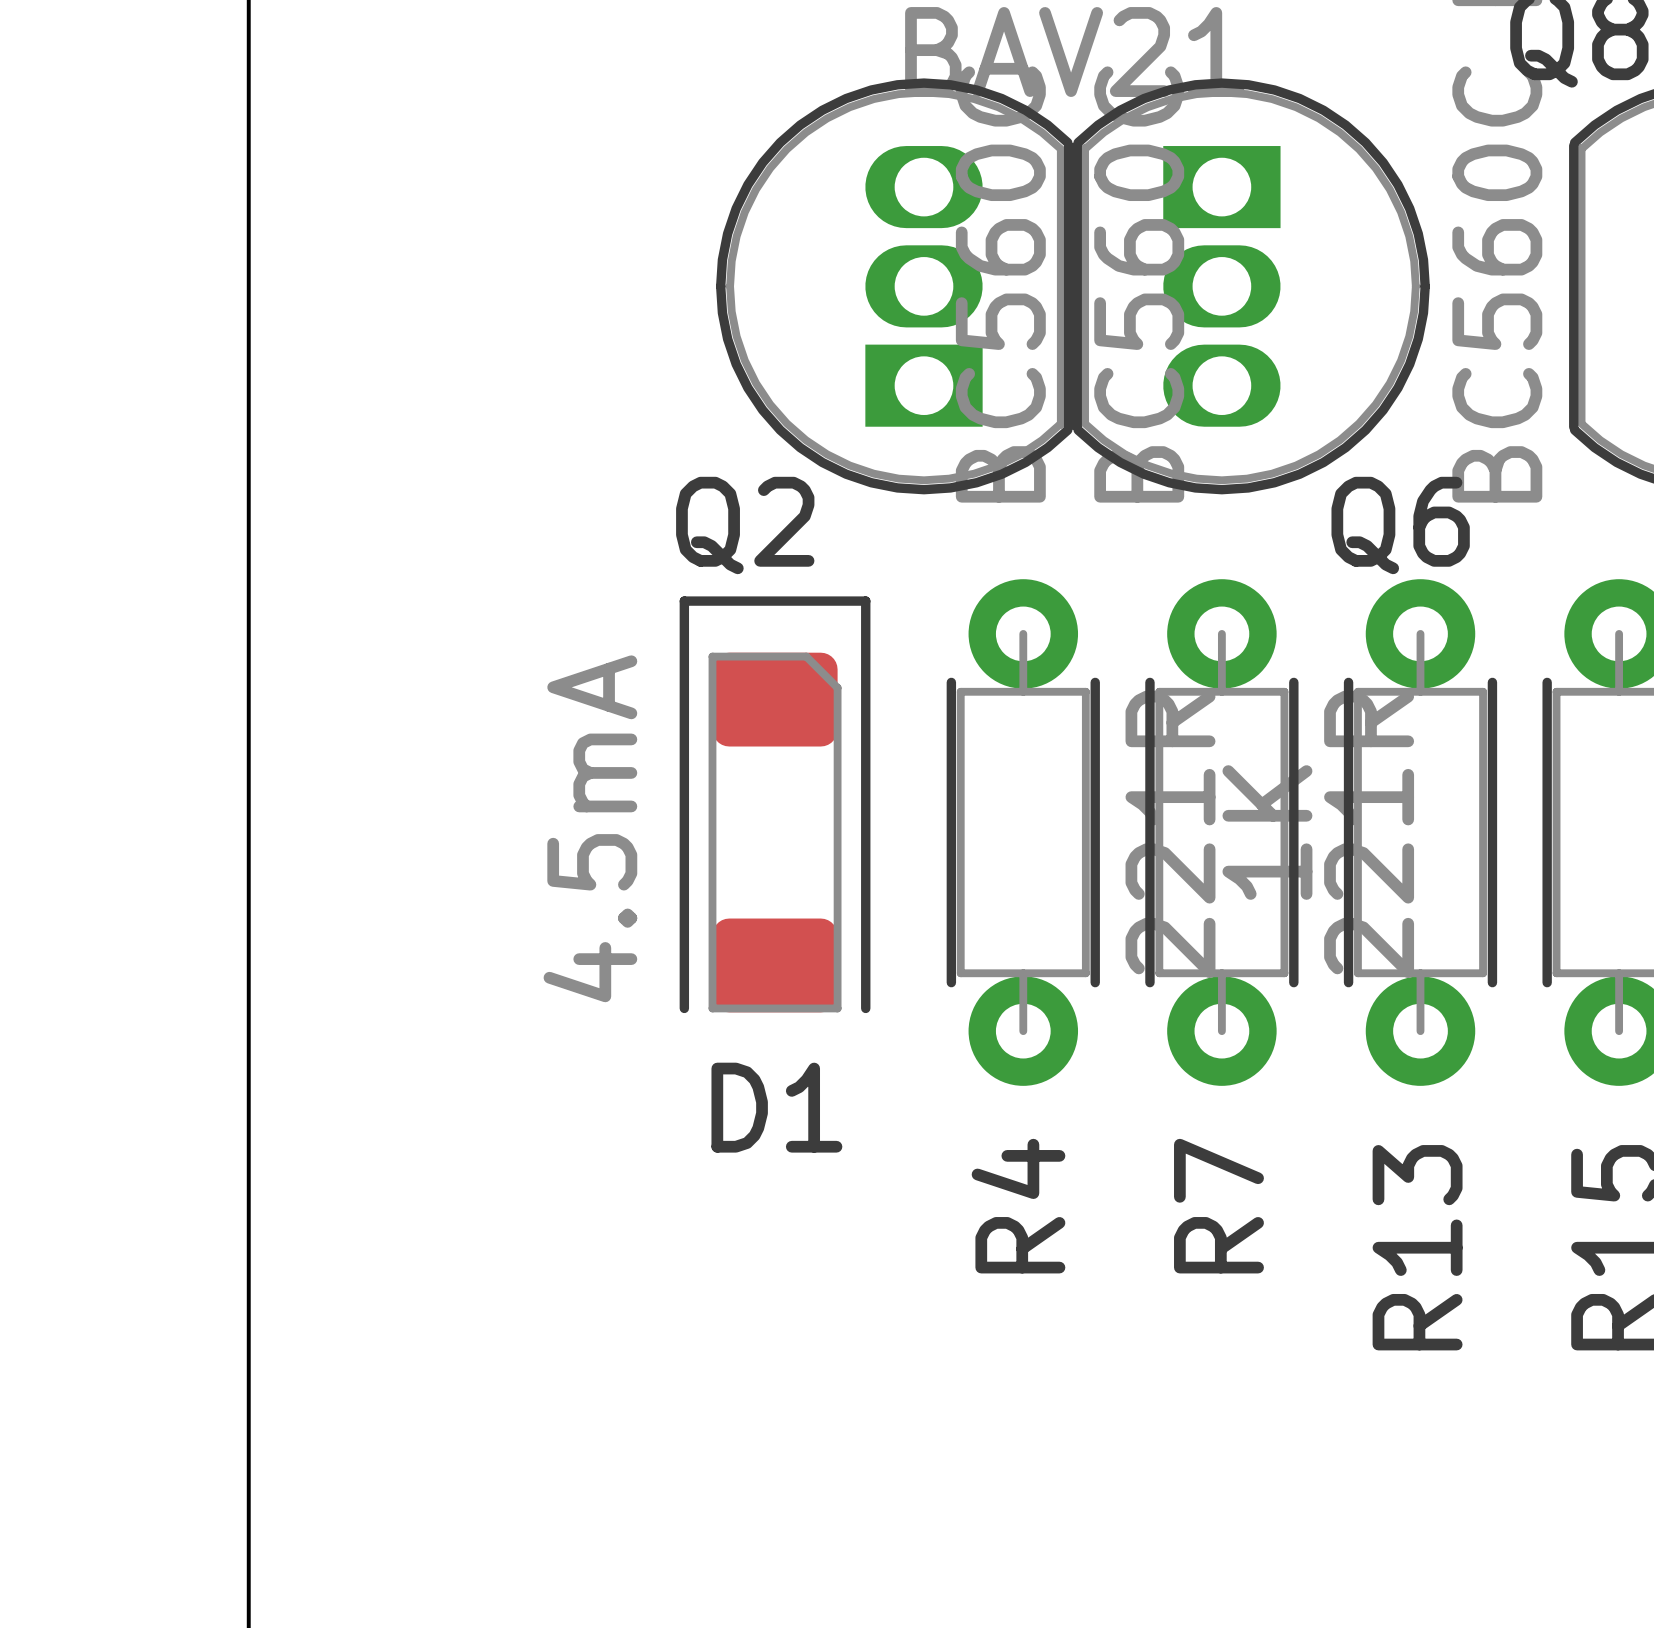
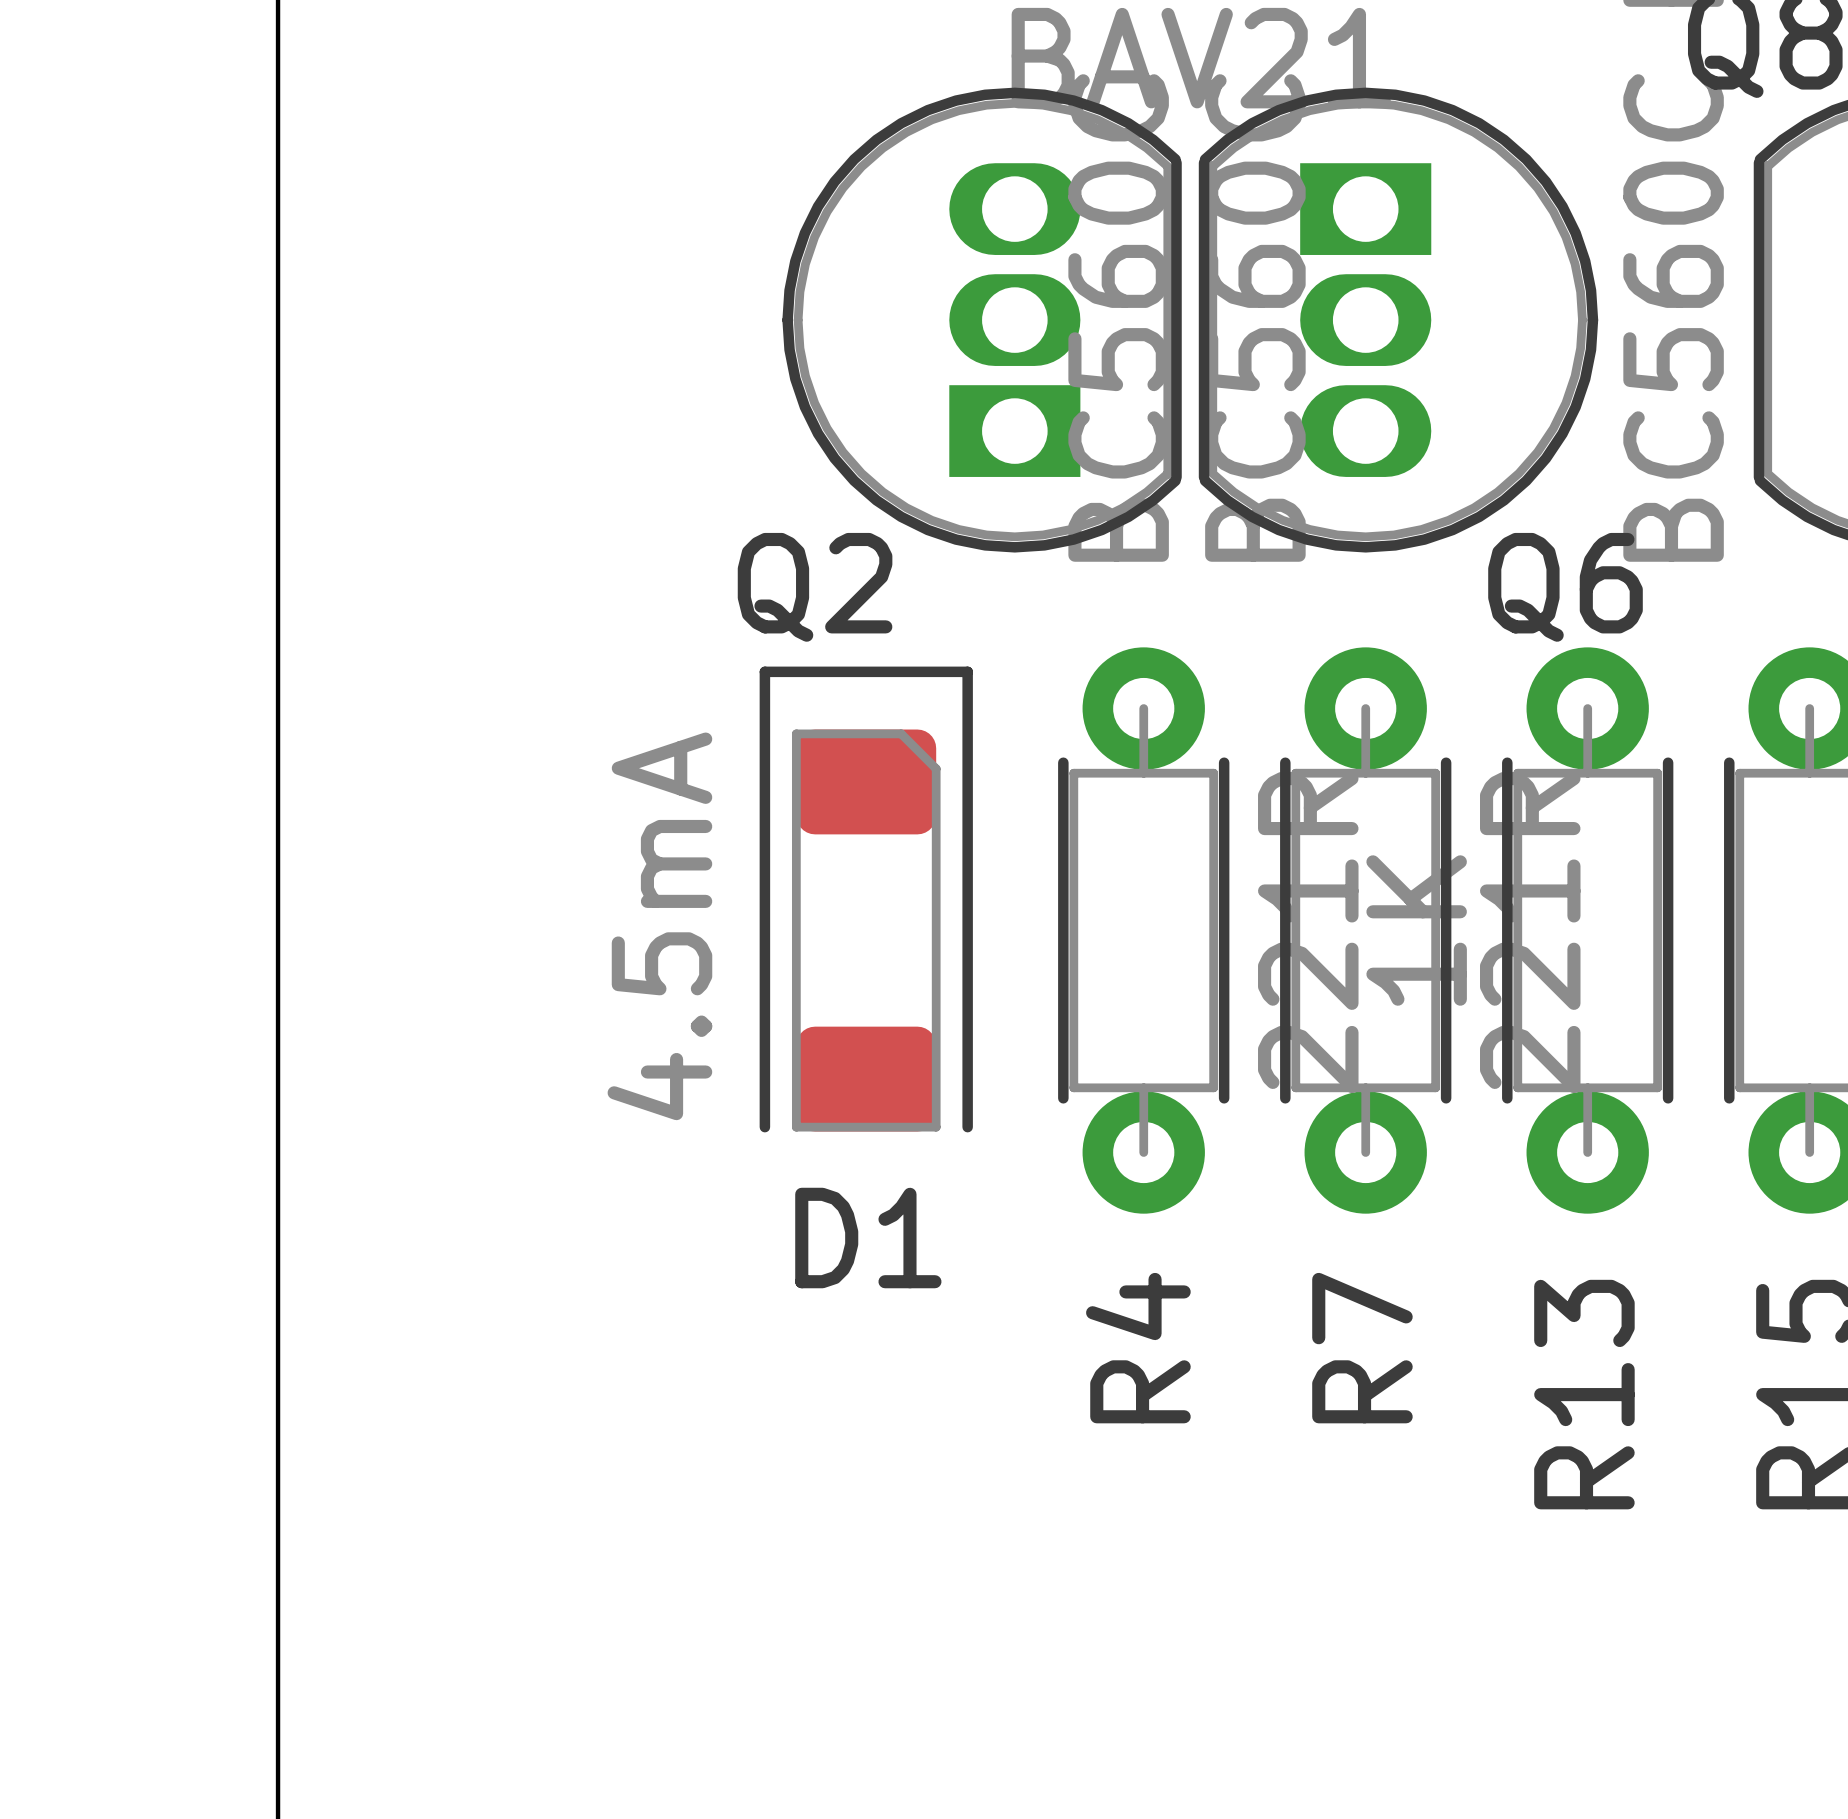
Q2 position: (894, 286) -> (982, 320)

